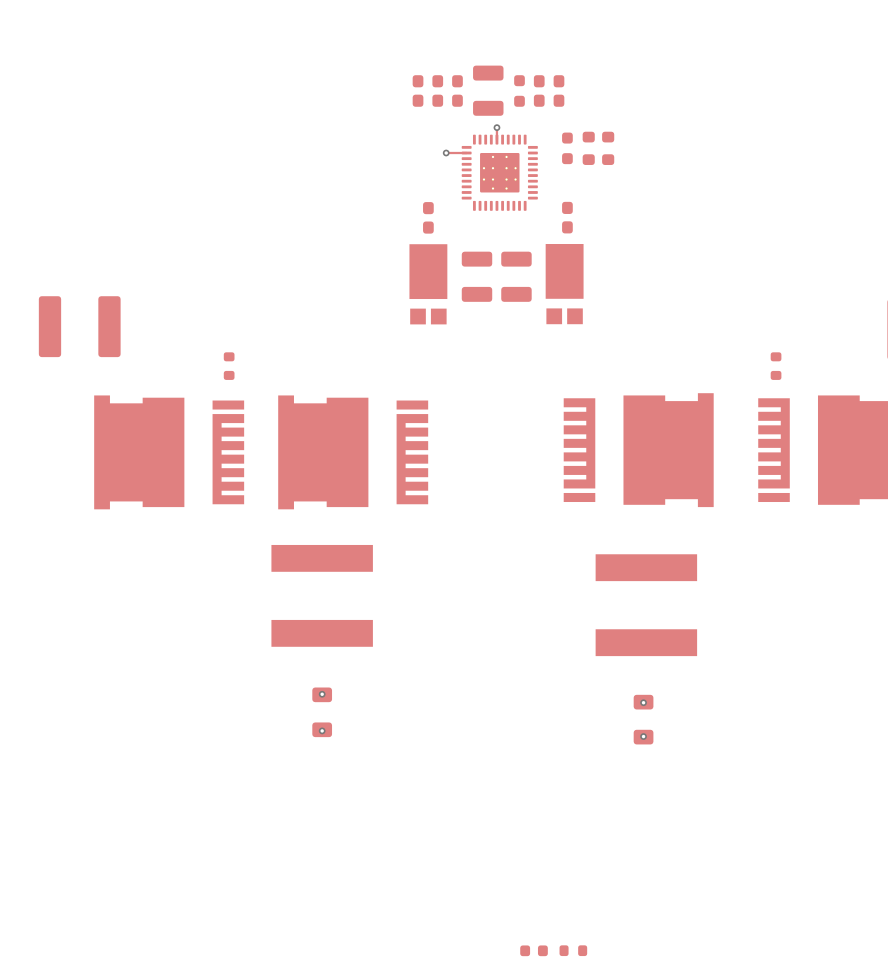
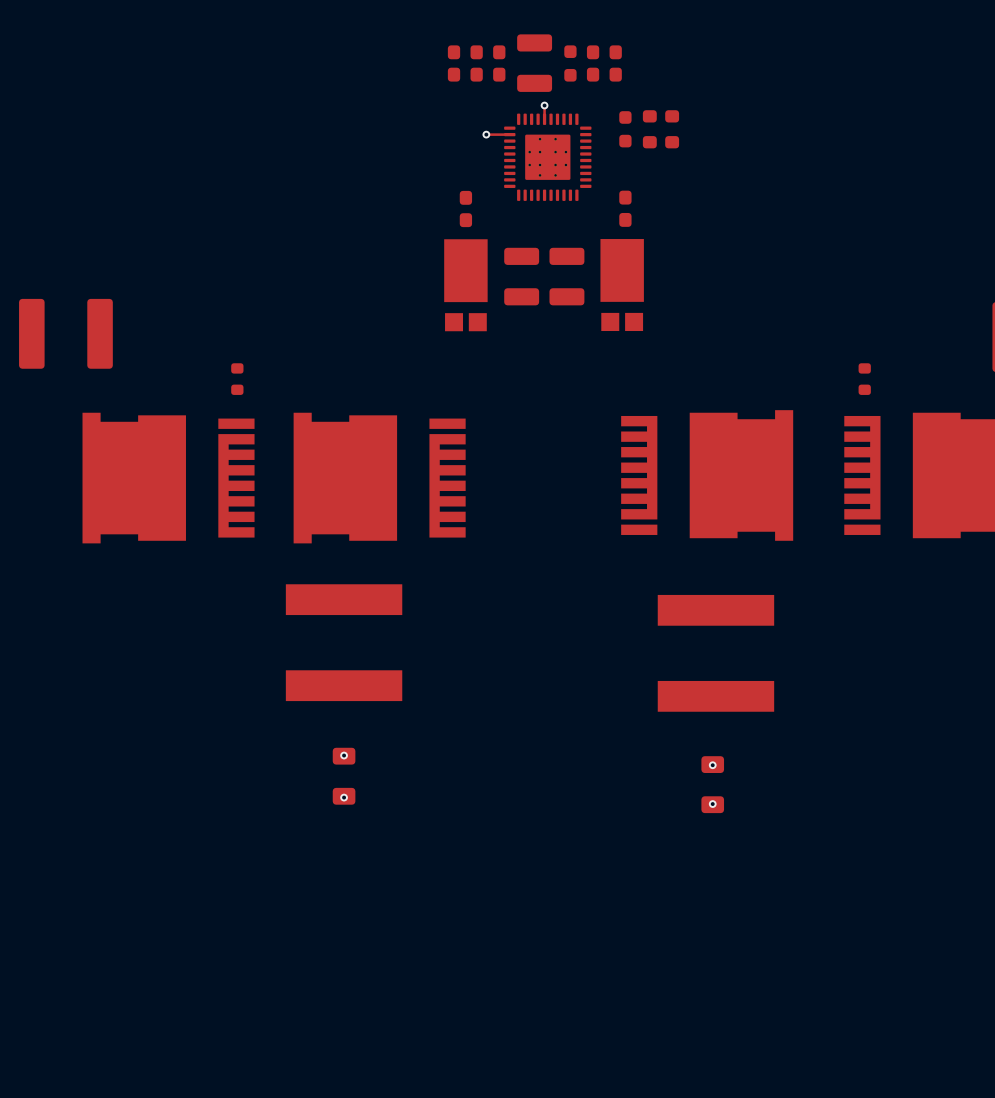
part: (534, 950) -> none
part: (573, 950) -> none

